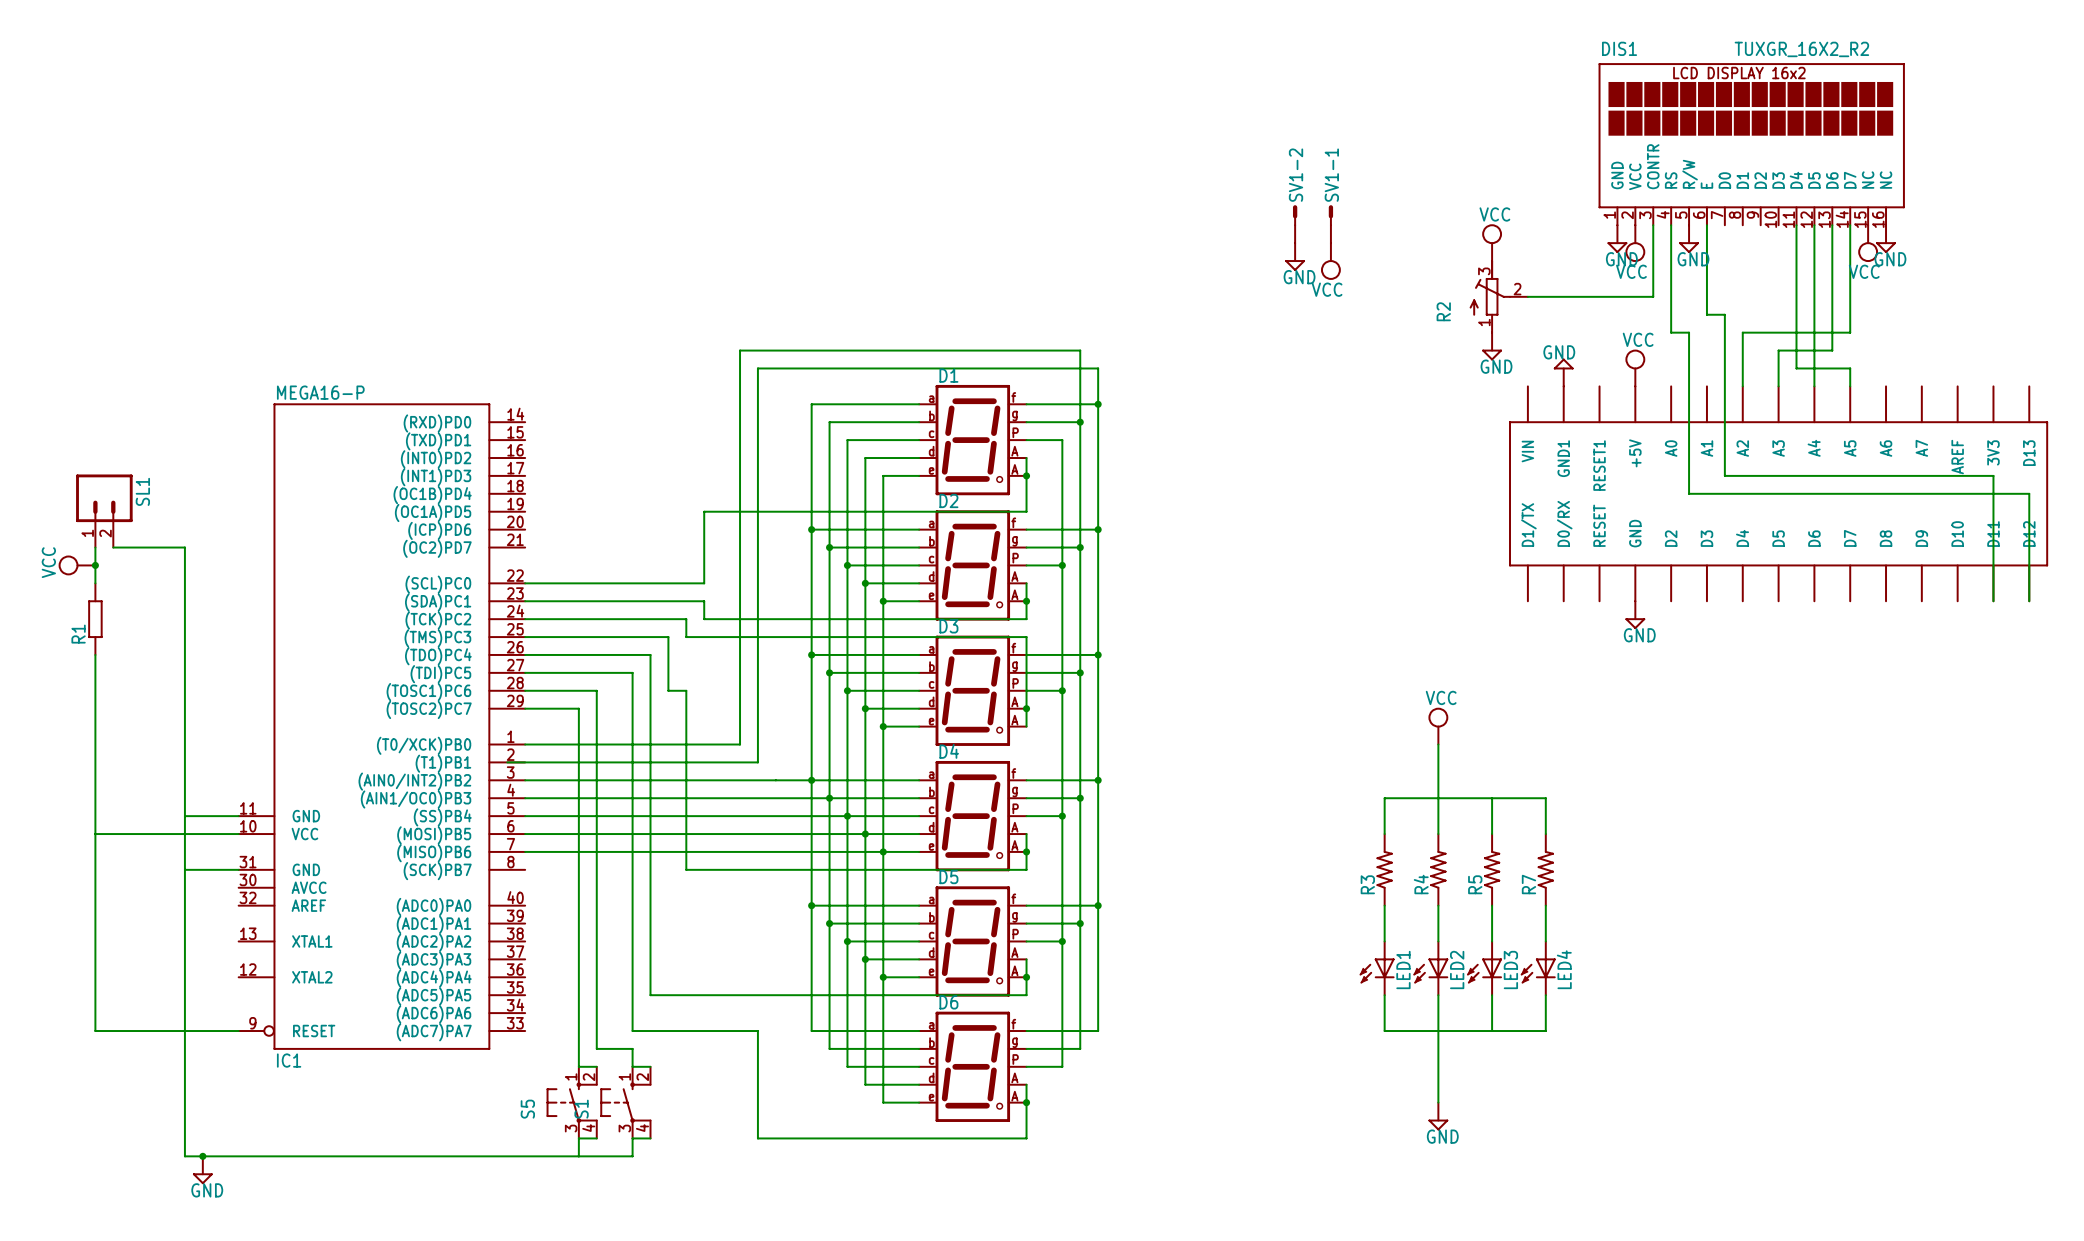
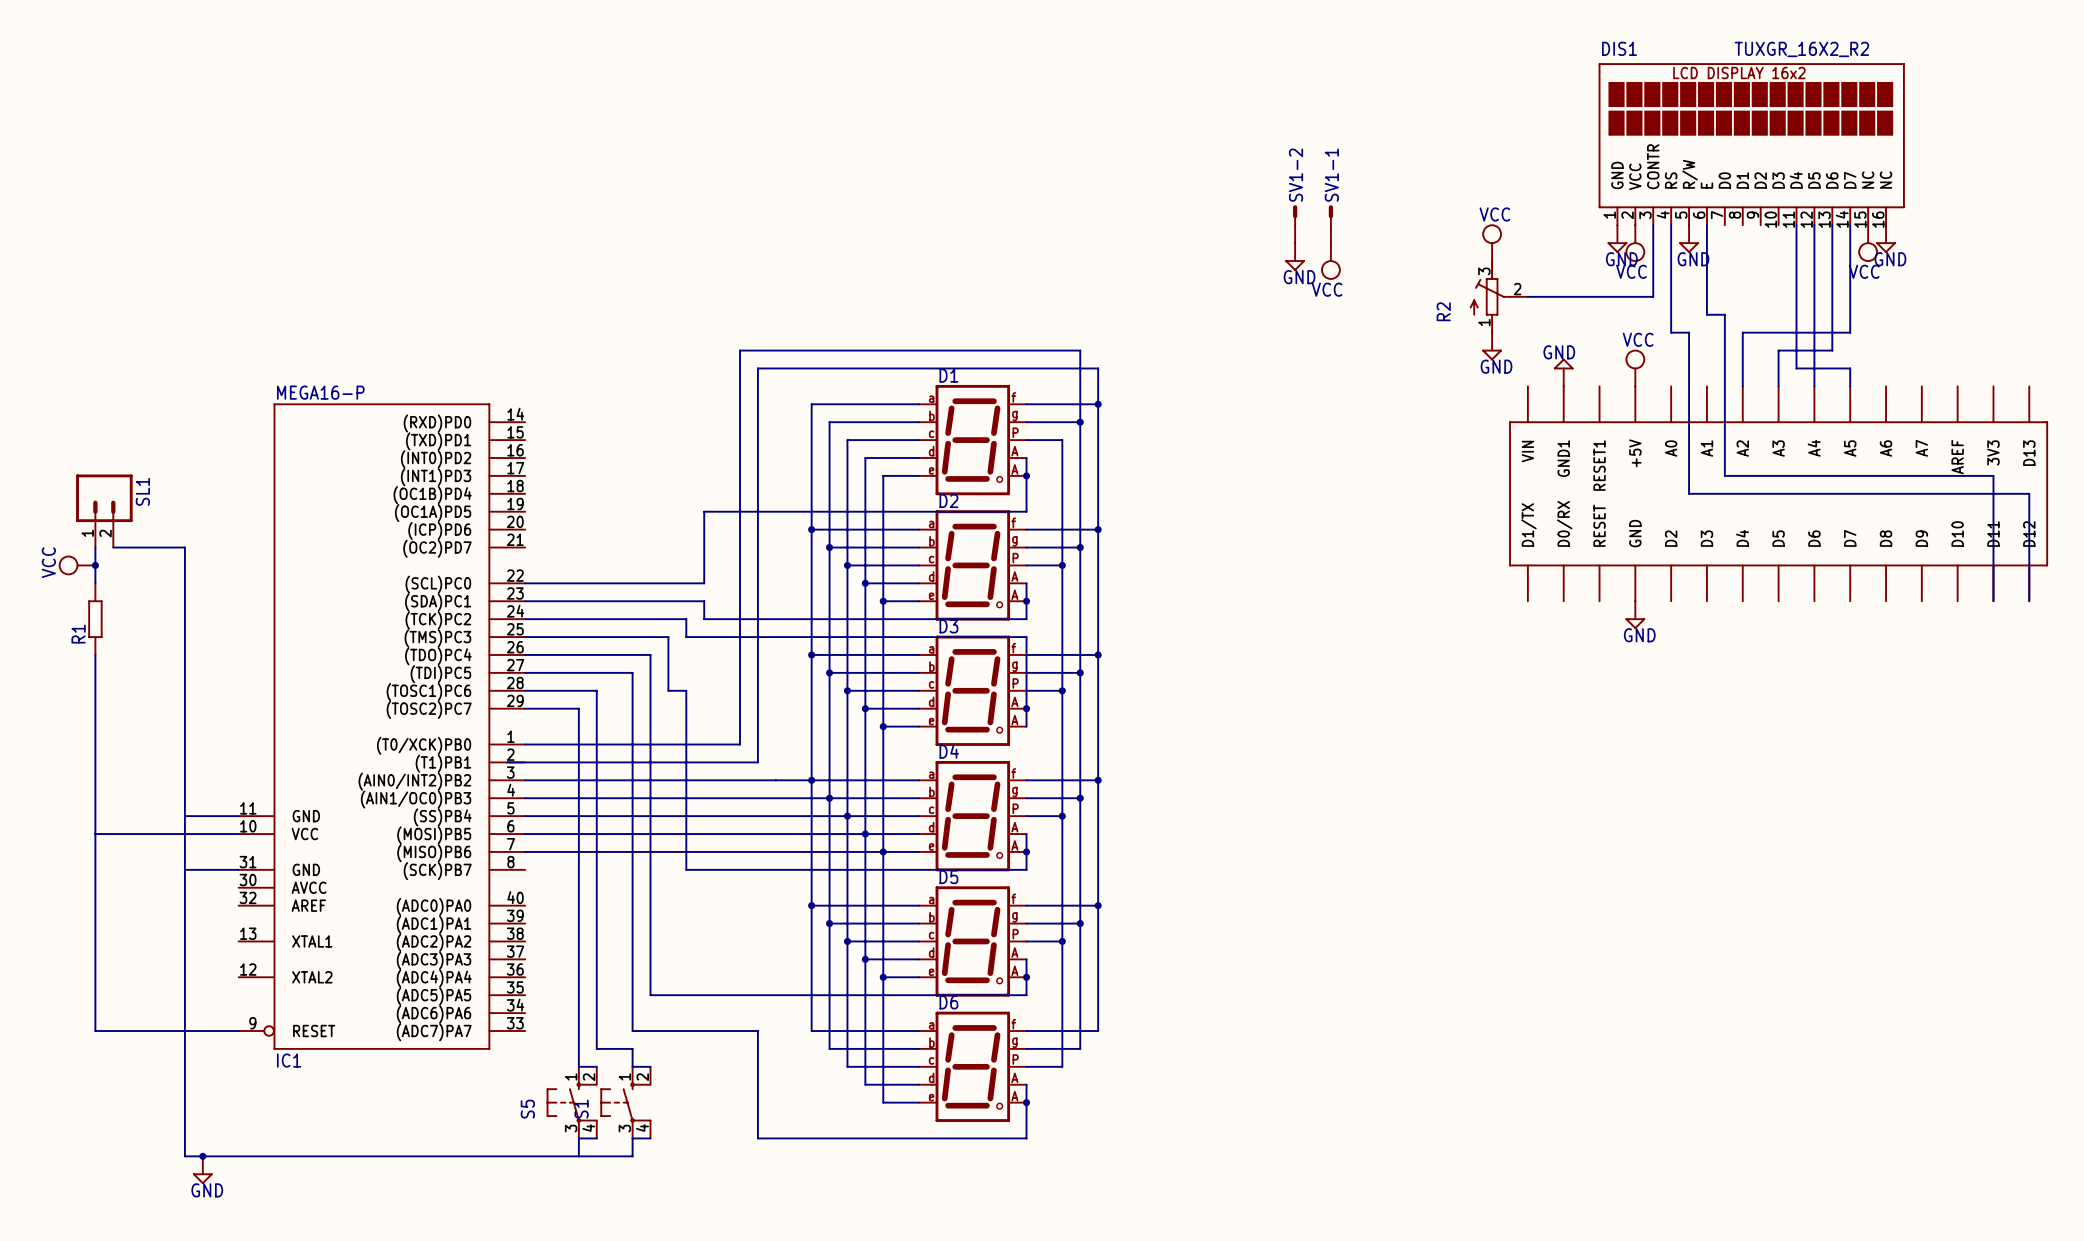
power symbol: VCC (1438, 726) -> none
wire: (1438, 744) (1438, 834) -> none
wire: (1492, 798) (1492, 834) -> none
wire: (1384, 834) (1384, 798) (1545, 798) (1545, 834) -> none
R3: (1384, 869) -> none
R4: (1438, 869) -> none
R5: (1492, 869) -> none
R7: (1545, 869) -> none
wire: (1384, 905) (1384, 941) -> none
wire: (1438, 905) (1438, 941) -> none
wire: (1492, 905) (1492, 941) -> none
wire: (1545, 905) (1545, 941) -> none
LED1: (1377, 968) -> none
LED2: (1430, 968) -> none
LED3: (1484, 968) -> none
LED4: (1538, 968) -> none
wire: (1384, 995) (1384, 1031) (1545, 1031) (1545, 995) -> none
wire: (1438, 995) (1438, 1102) -> none
wire: (1492, 995) (1492, 1031) -> none
power symbol: GND (1438, 1116) -> none

